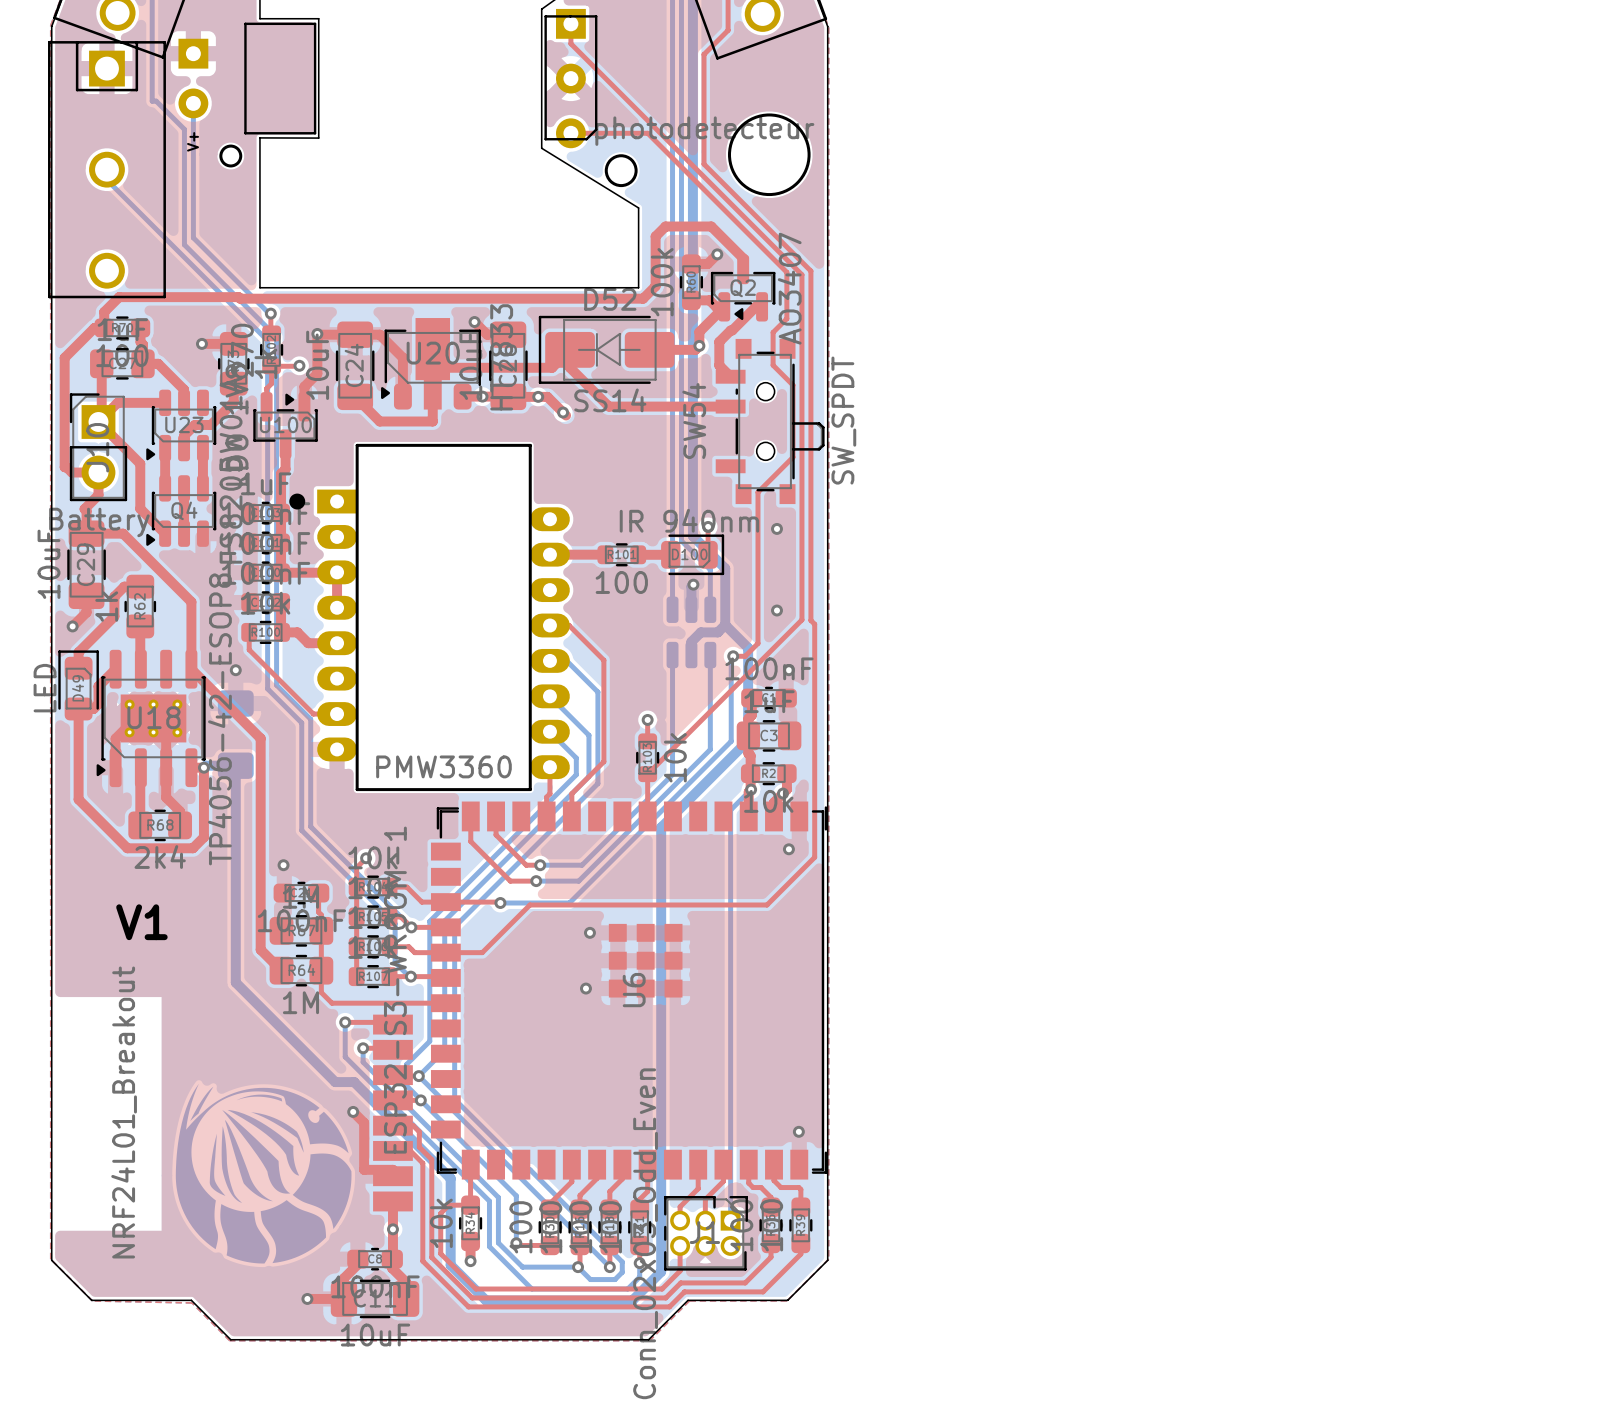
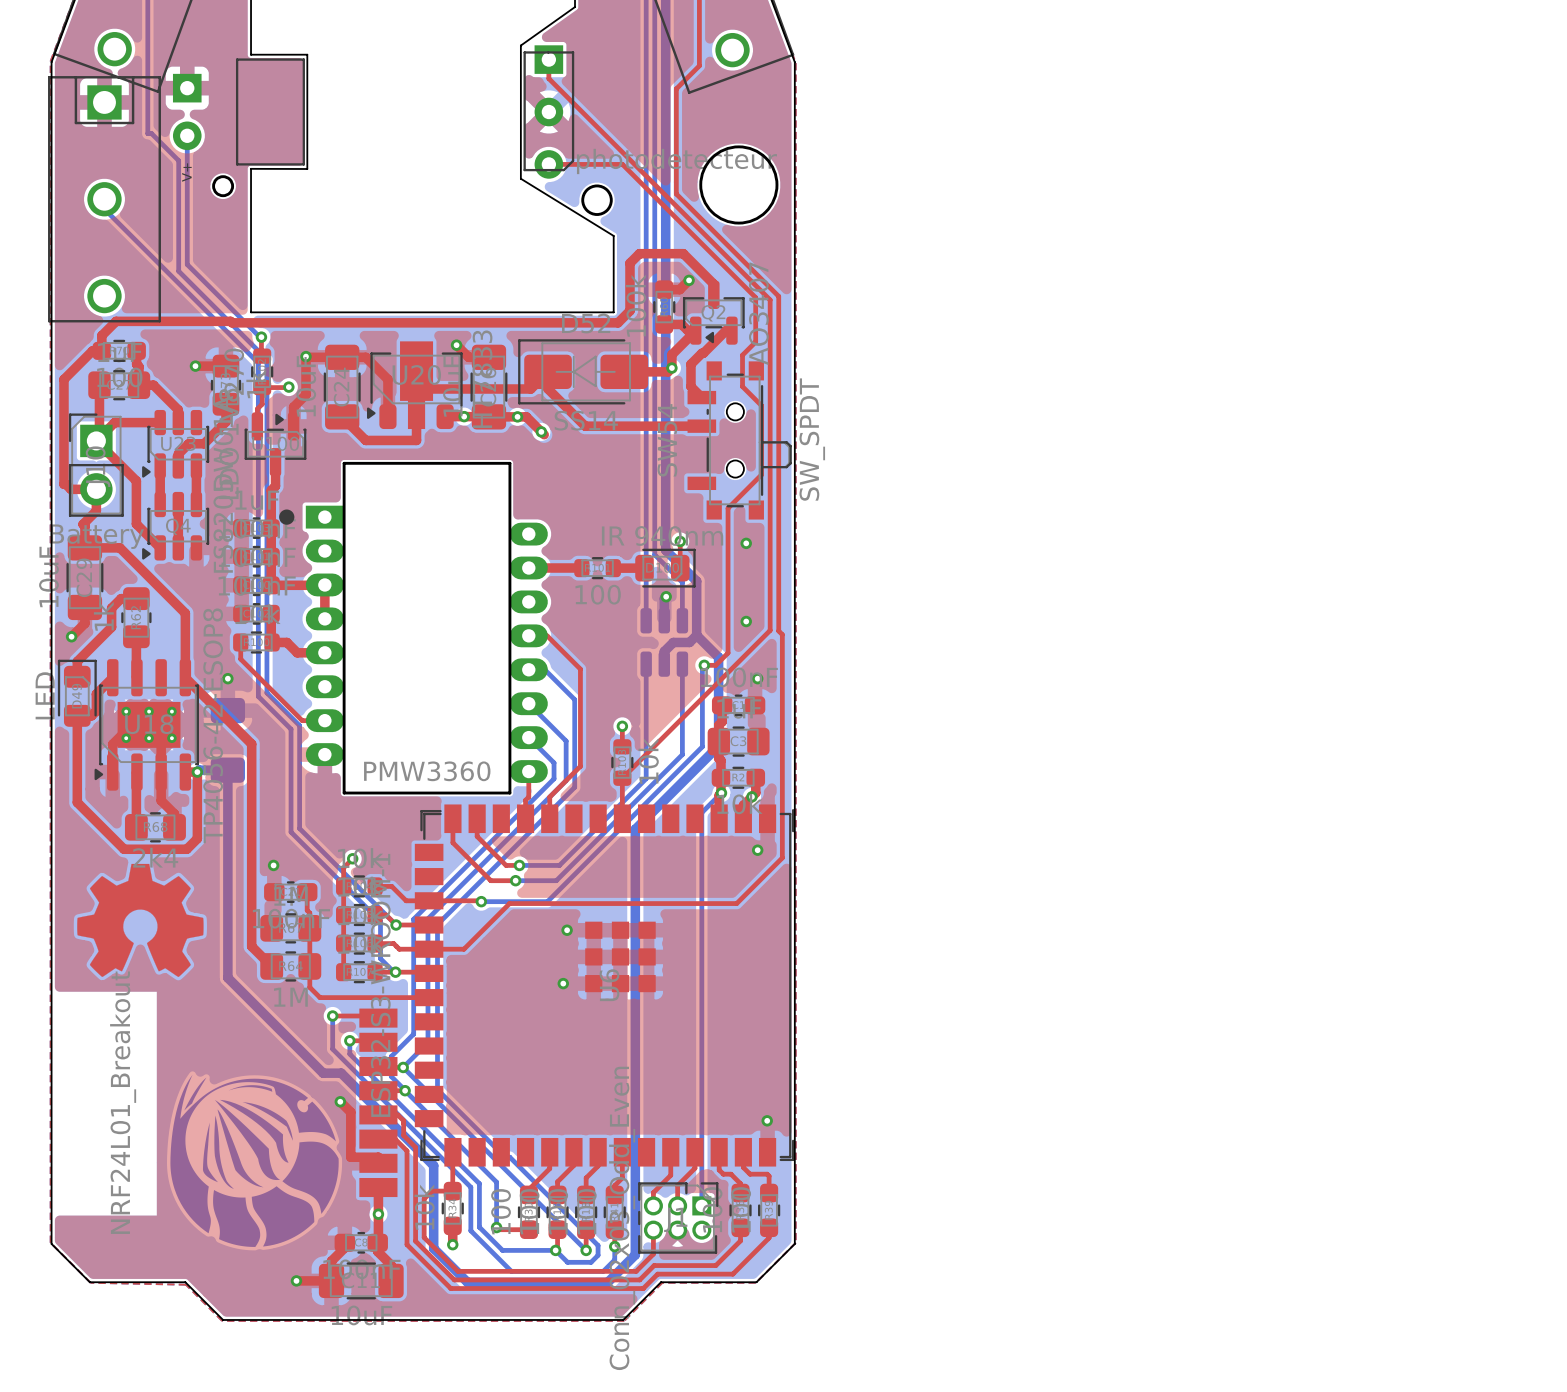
drawing: none -> [77, 863, 204, 977]
text: V1 (141, 922) -> none

